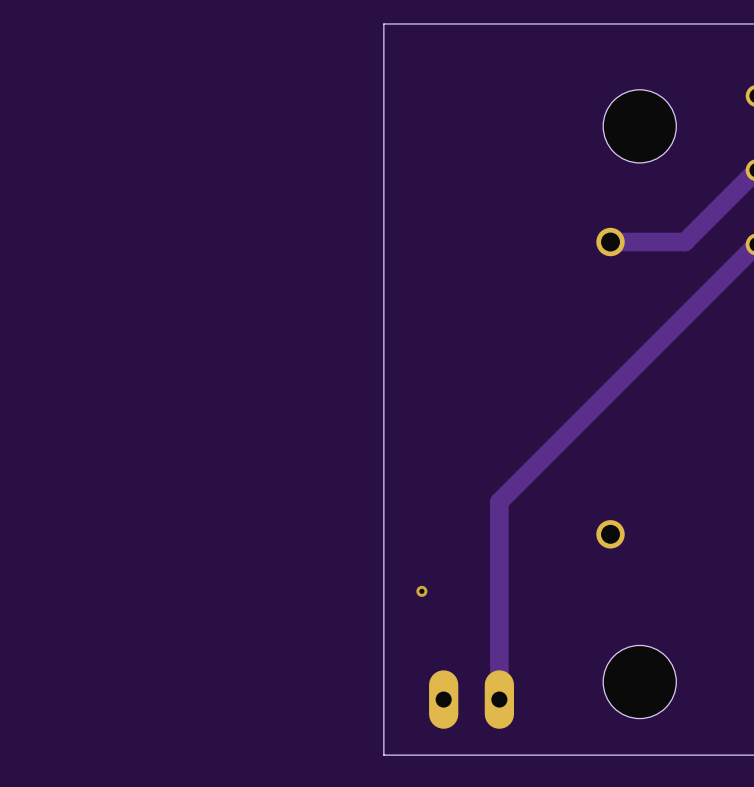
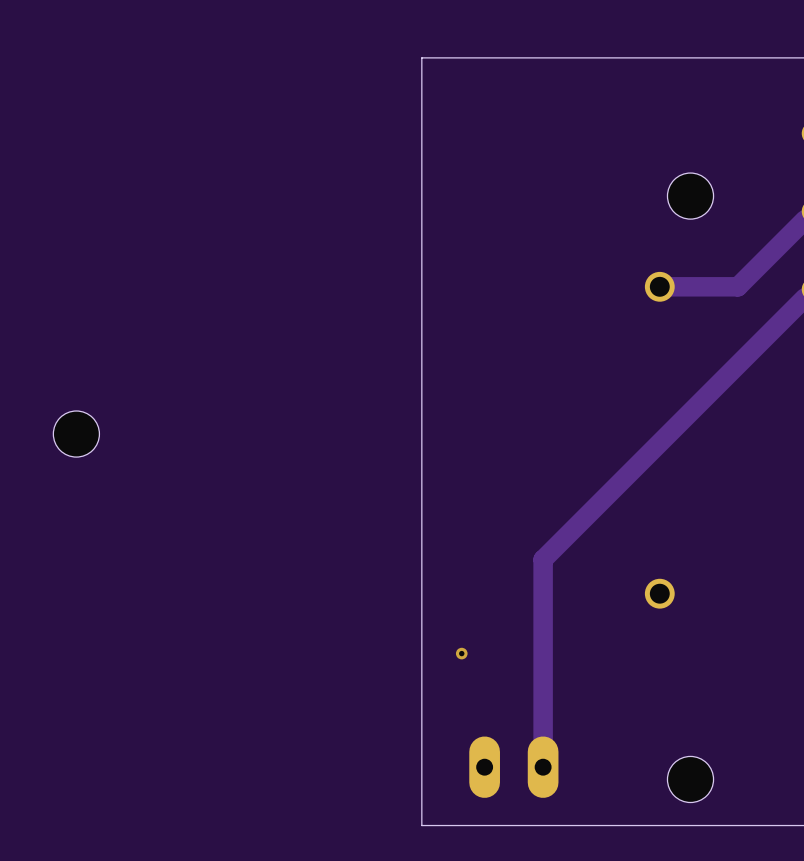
hole: (639, 126) -> none
hole: none -> (690, 196)
hole: none -> (76, 434)
hole: (639, 682) -> none
hole: none -> (690, 779)

